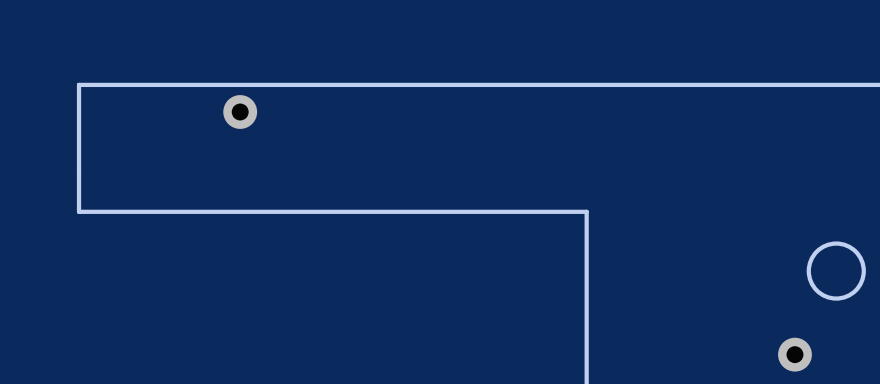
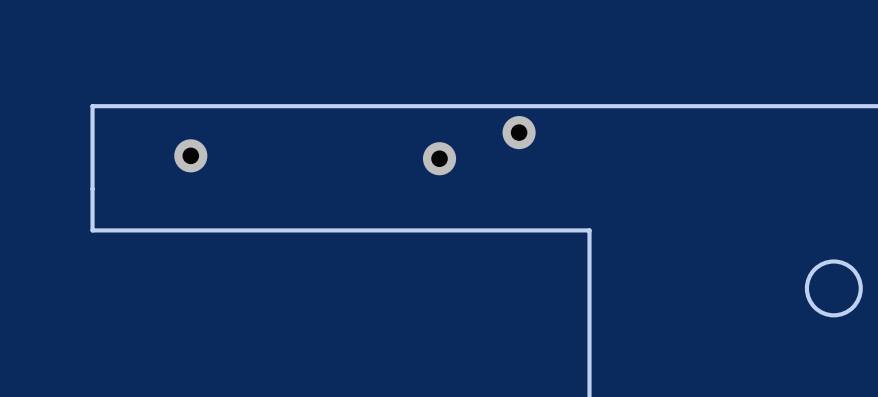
via: none -> (519, 132)
via position: (240, 112) -> (190, 155)
via: none -> (439, 158)
via: (794, 354) -> none

